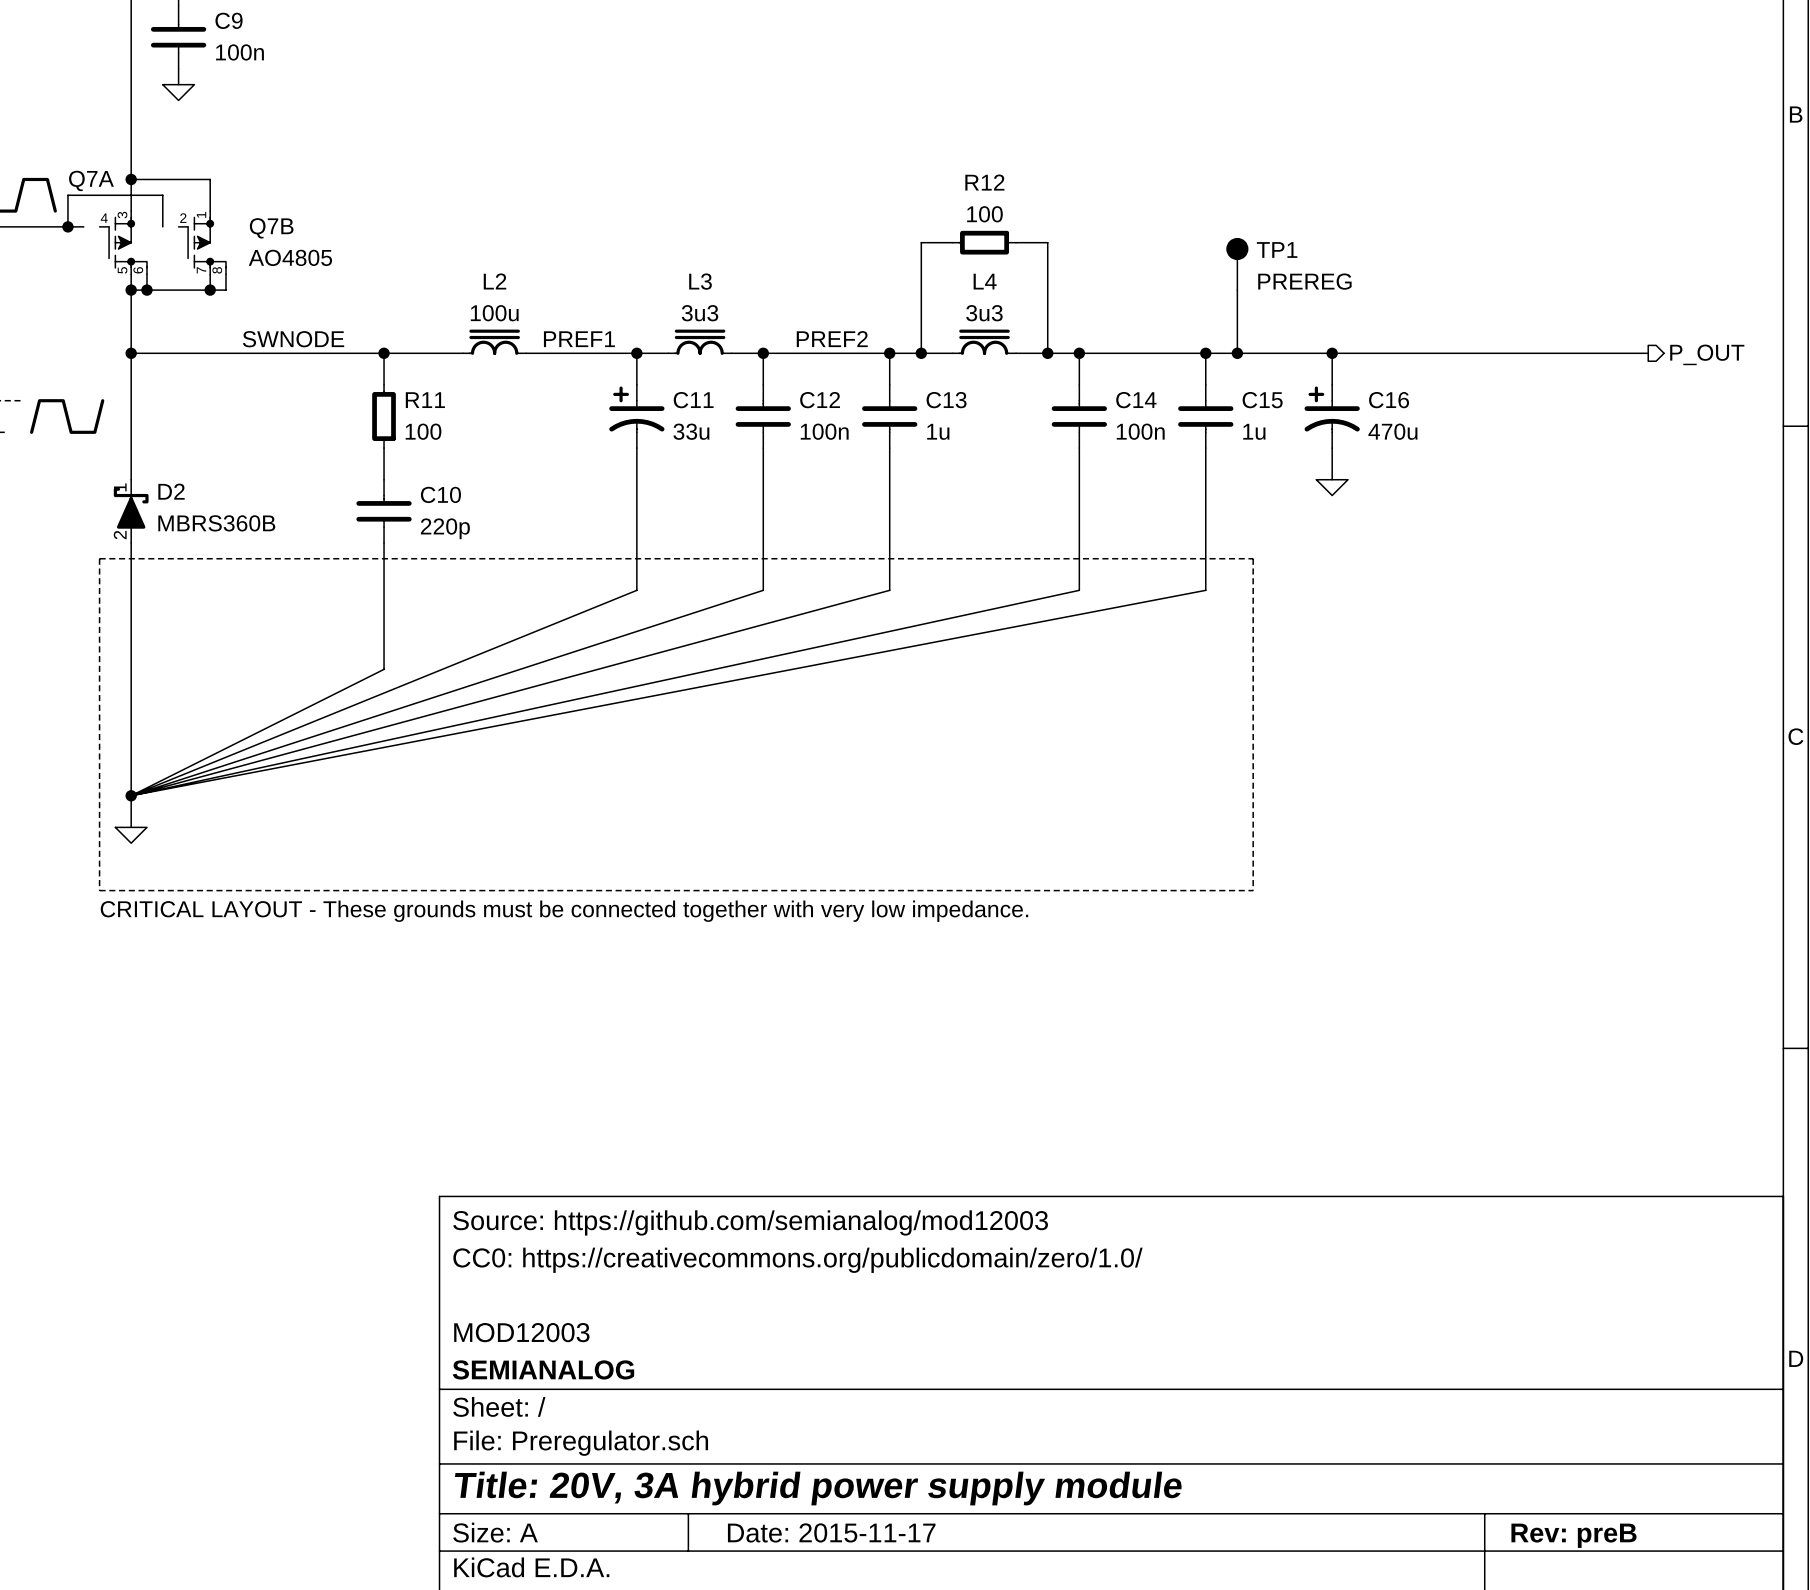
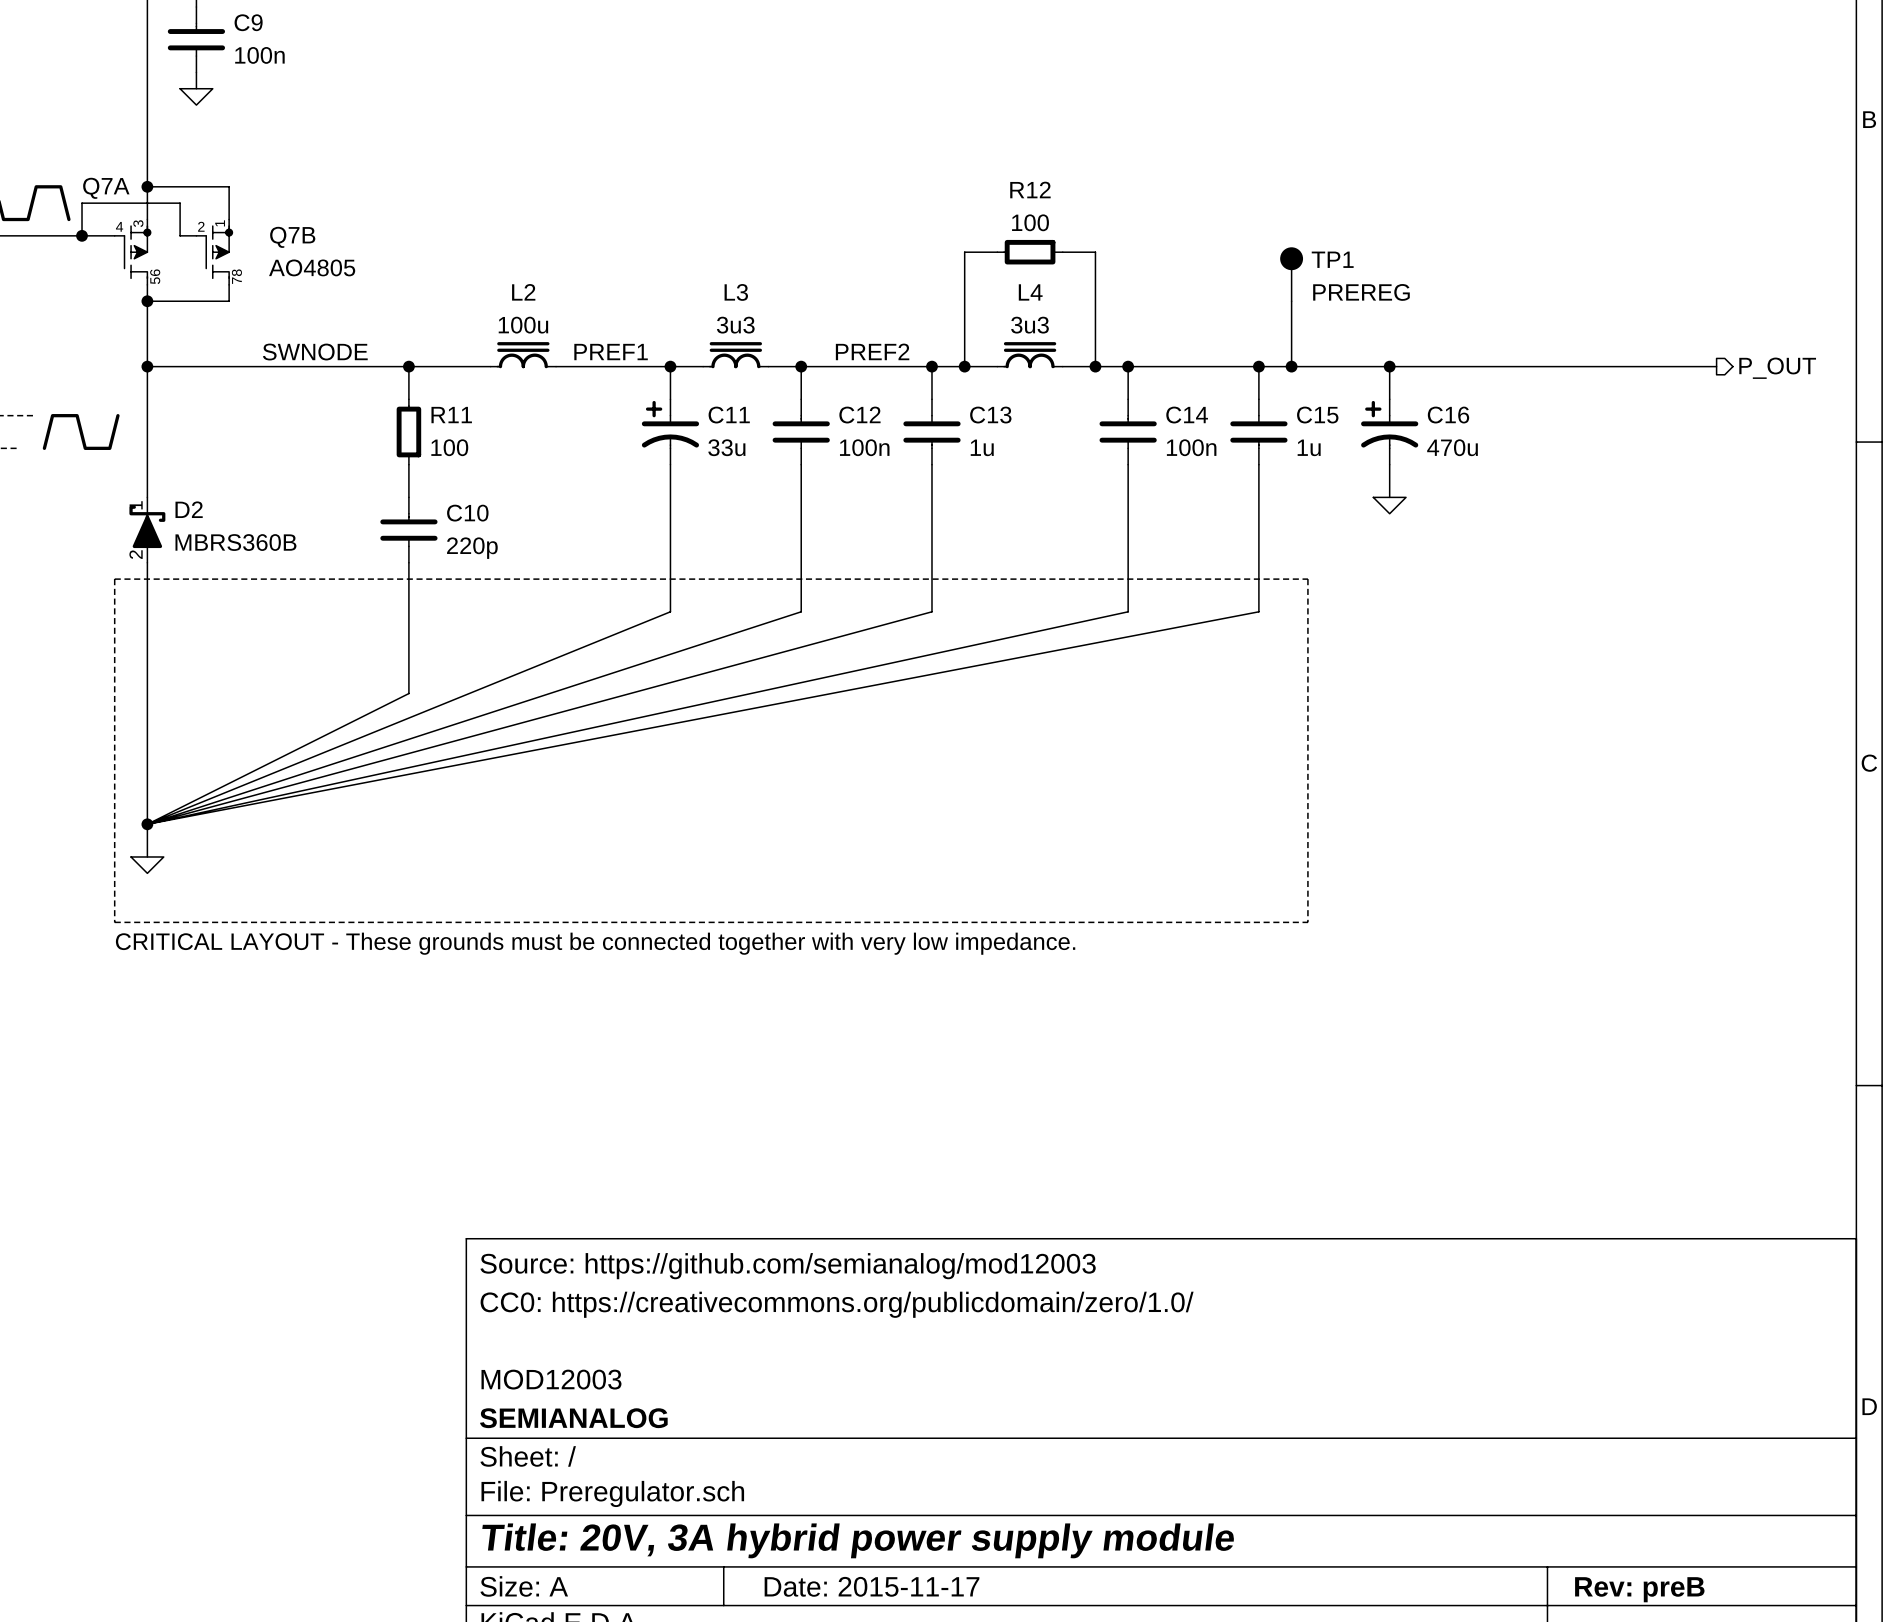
Q7A symbol: [99, 211, 147, 275] -> [114, 219, 151, 285]
Q7B symbol: [178, 211, 226, 275] -> [196, 219, 233, 285]
wire: none -> (98, 235) (114, 235)
wire: none -> (180, 235) (196, 235)
wire: (146, 274) (146, 290) -> none
wire: (225, 274) (225, 290) (210, 290) -> none
junction: (146, 290) -> none
junction: (210, 290) -> none

